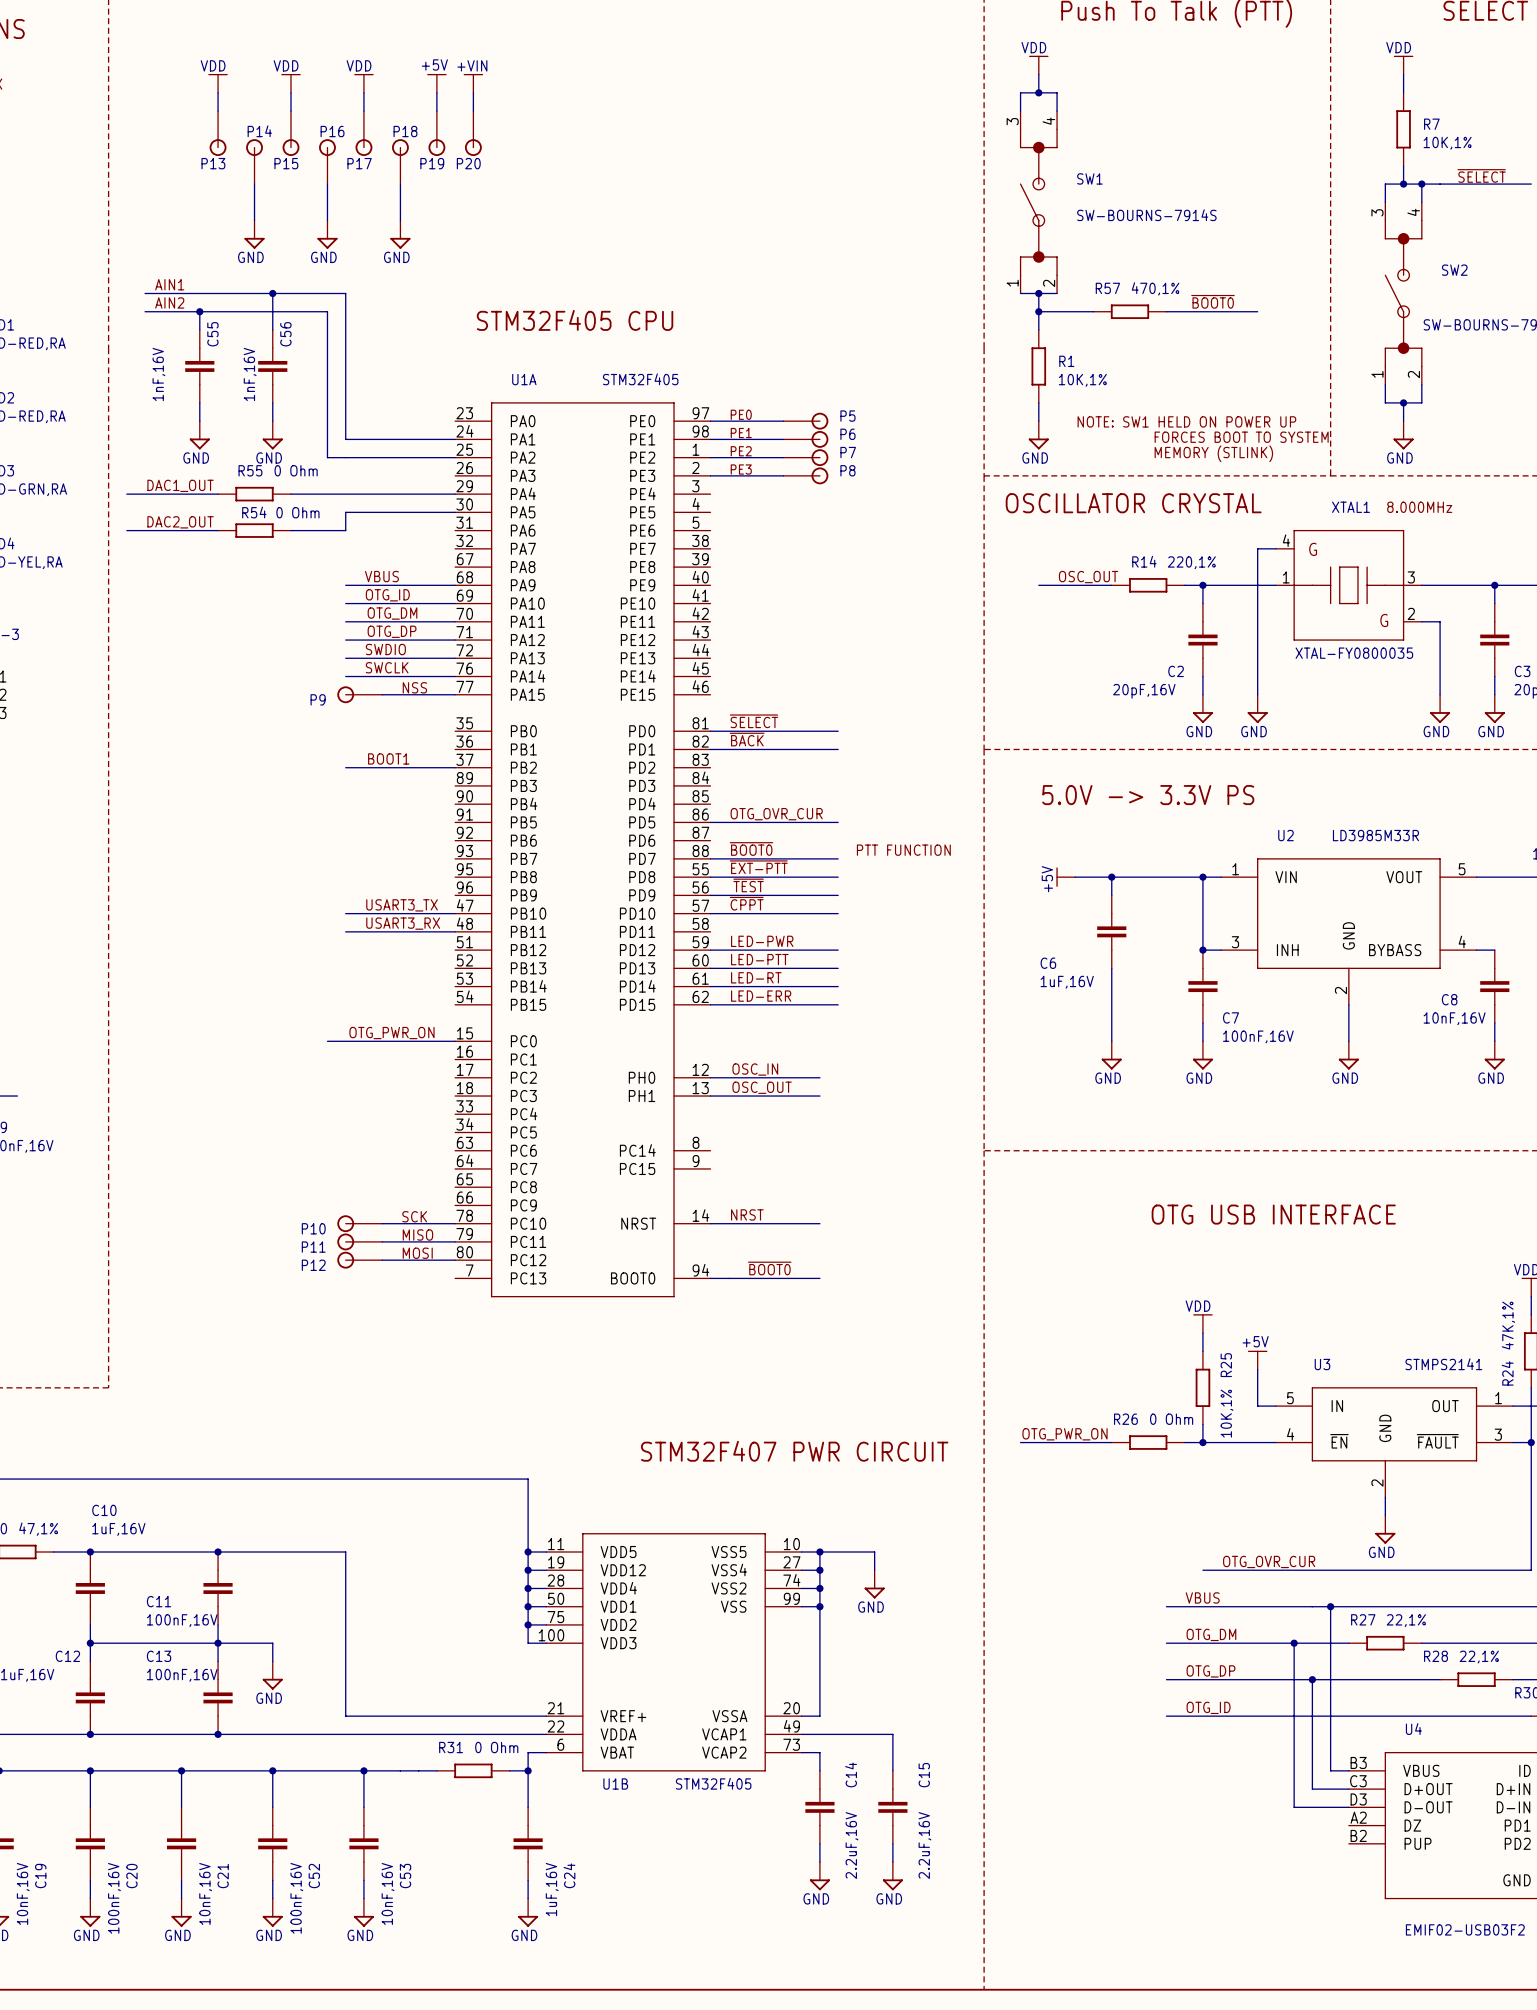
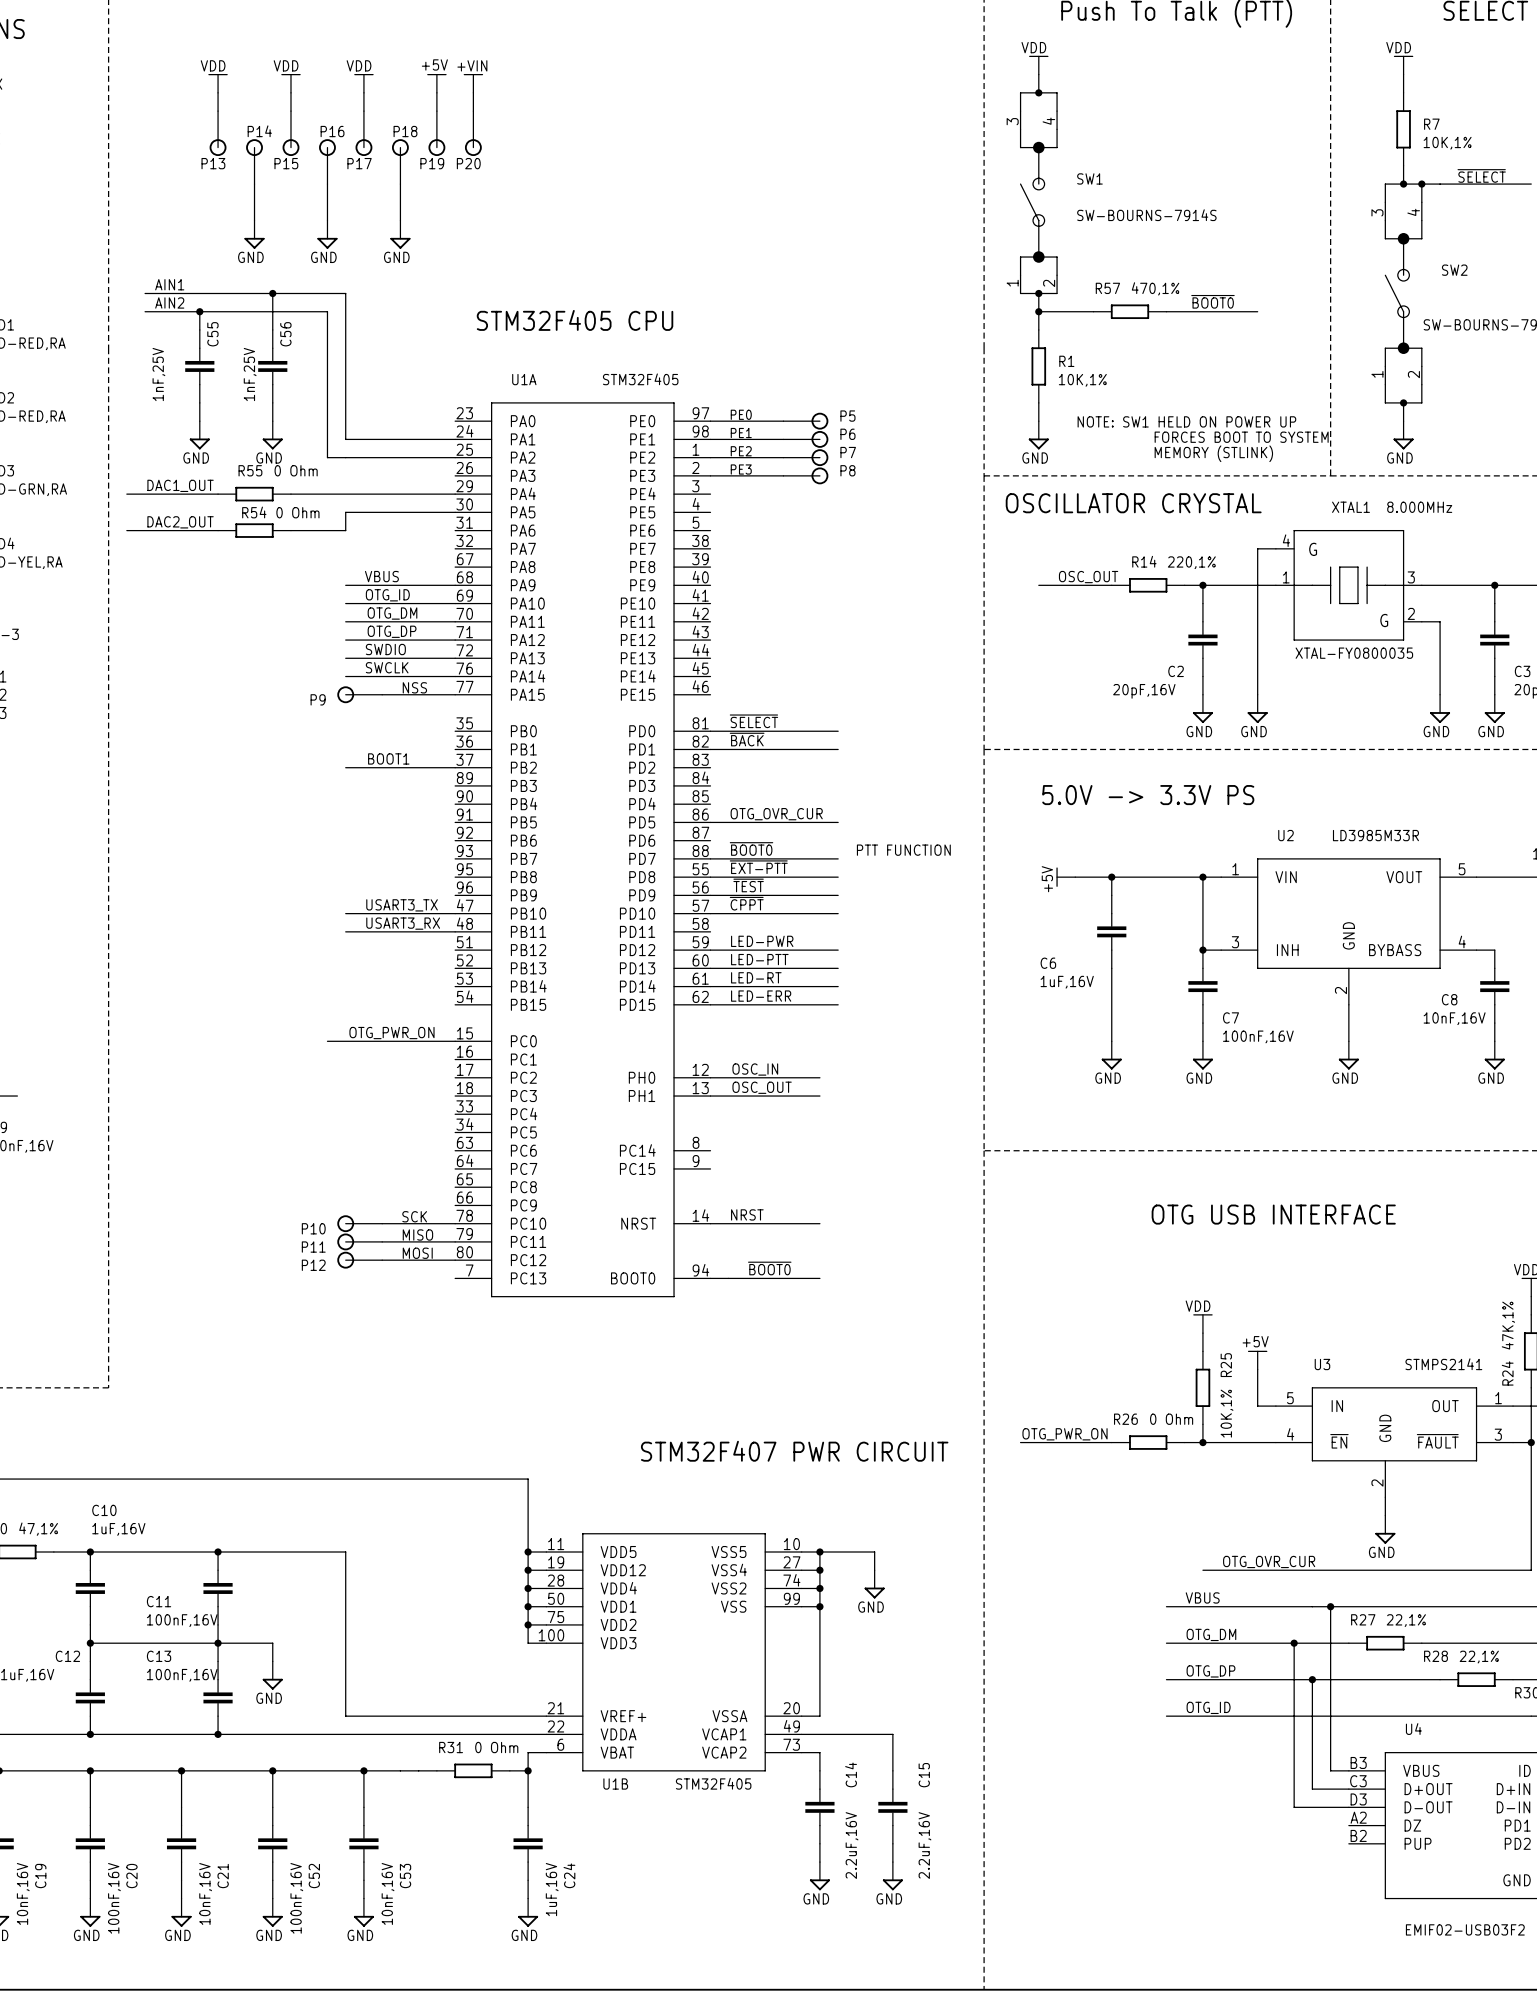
C55 value: 1nF,16V (158, 374) -> 1nF,25V (158, 374)
C56 value: 1nF,16V (250, 374) -> 1nF,25V (250, 374)

